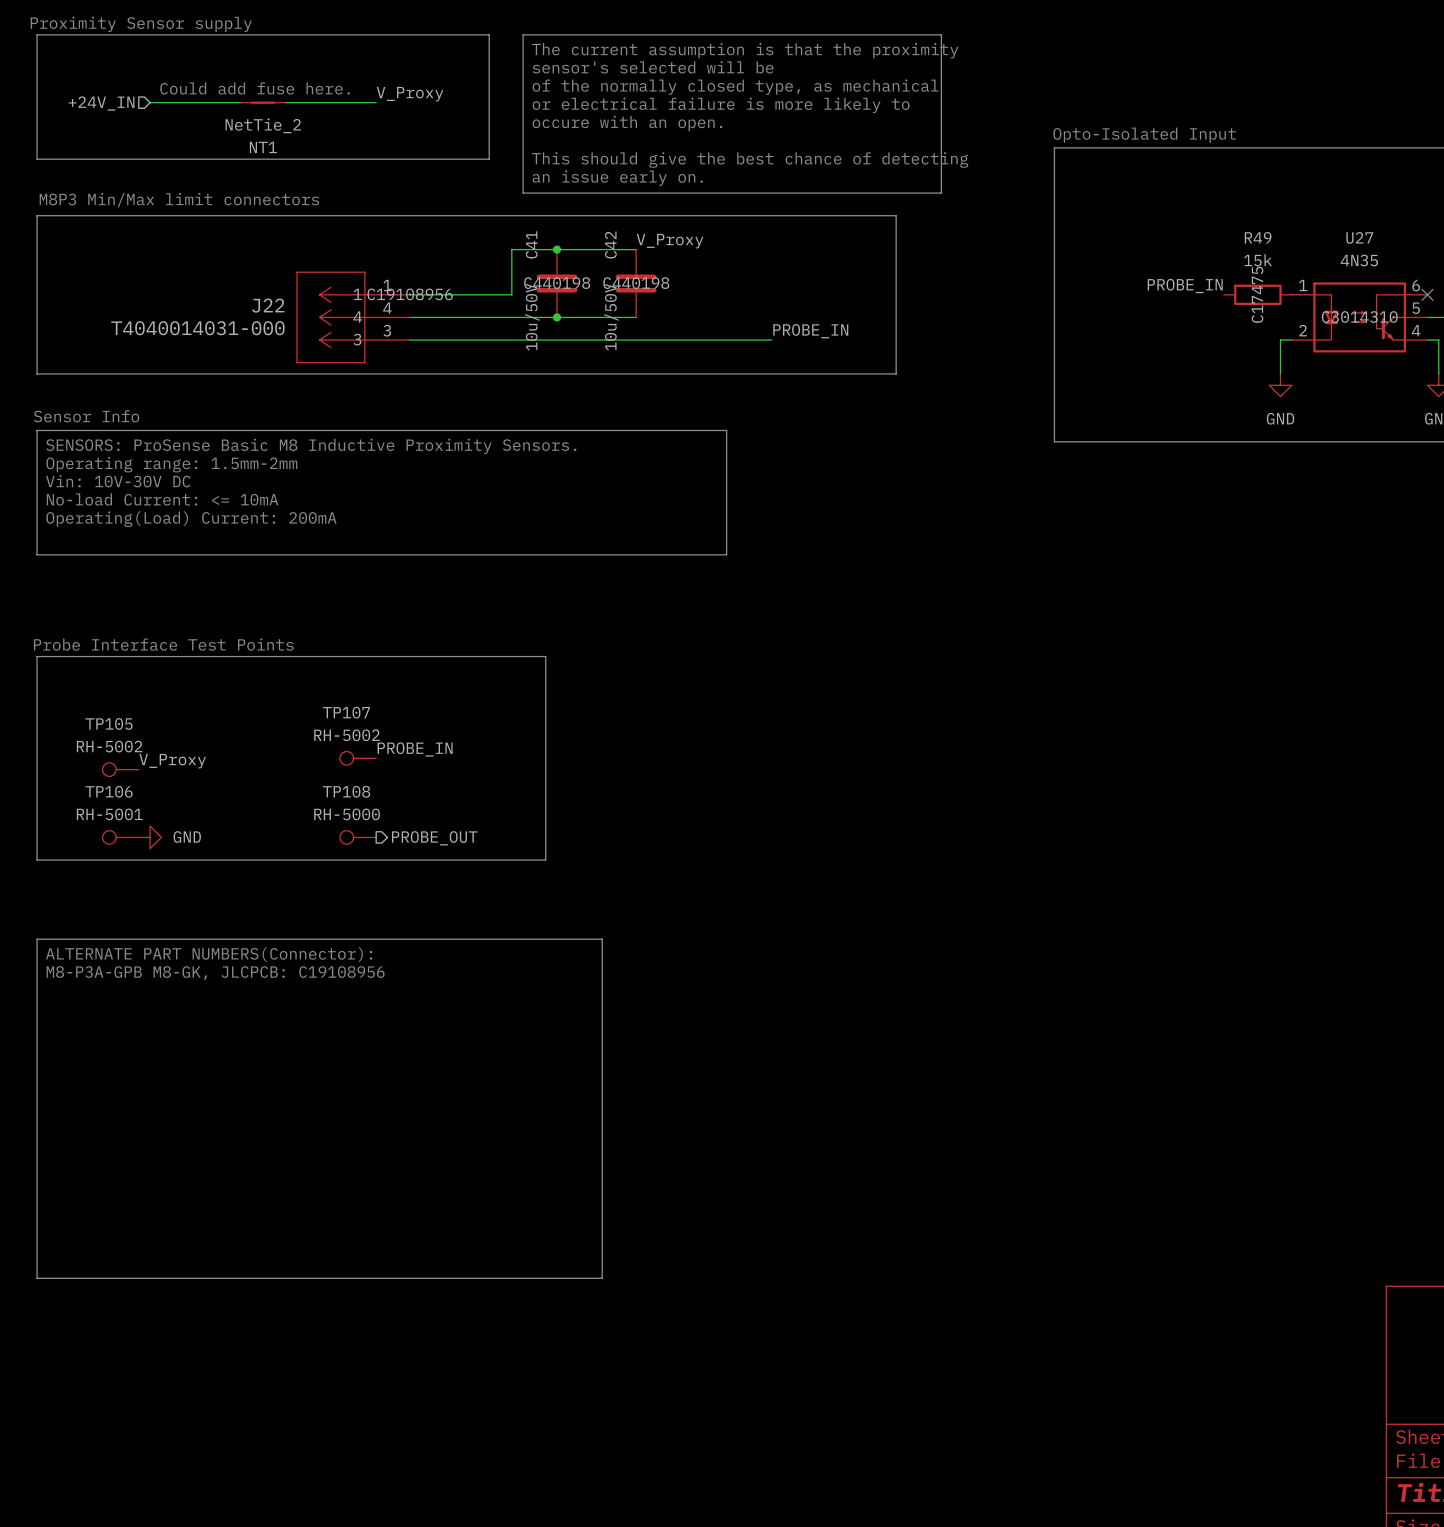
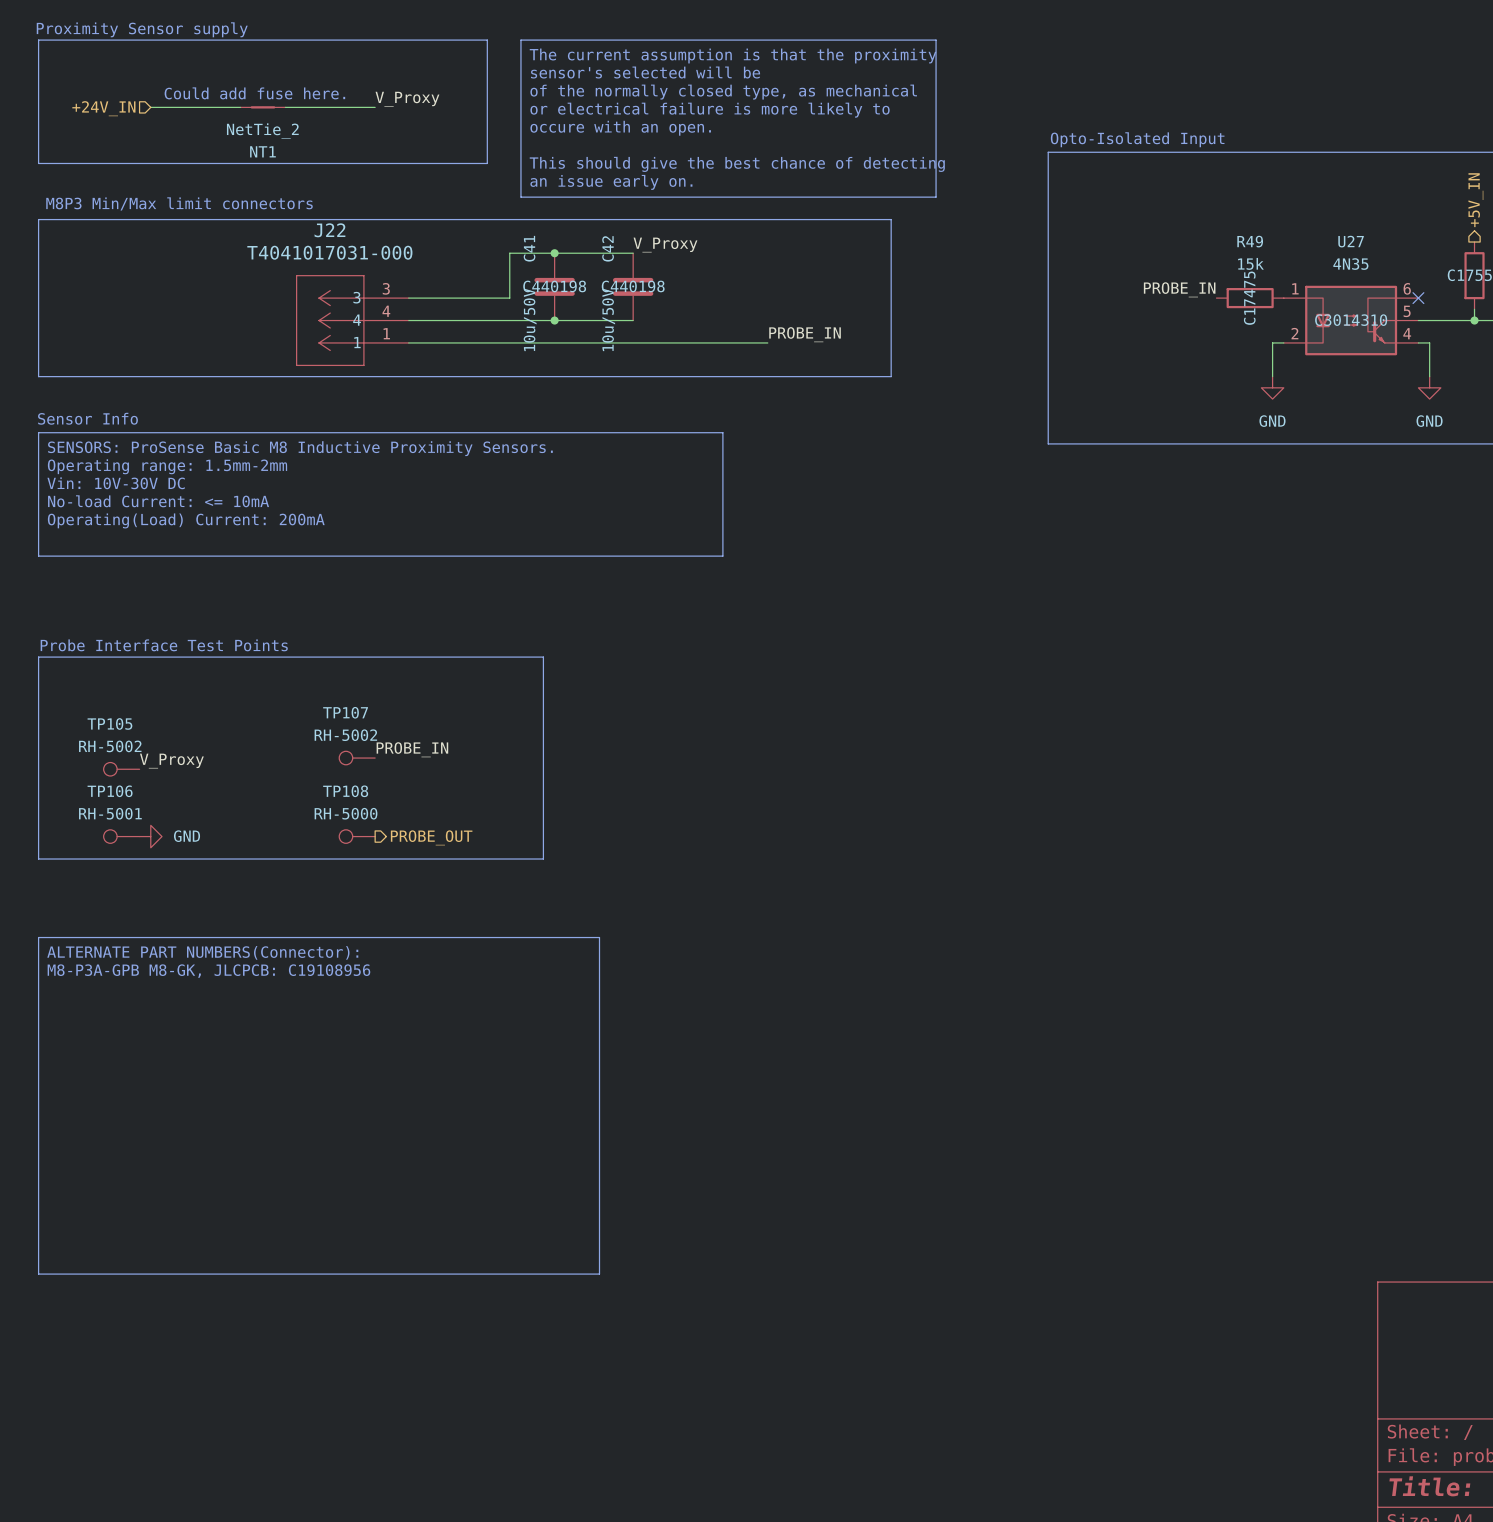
J22 text: C19108956 (410, 294) -> none
J22 name position: J22 (268, 305) -> J22 (329, 230)
J22 flip: as is (330, 317) -> up-down (330, 320)
J22 value: T4040014031-000 (197, 328) -> T4041017031-000 (329, 252)

